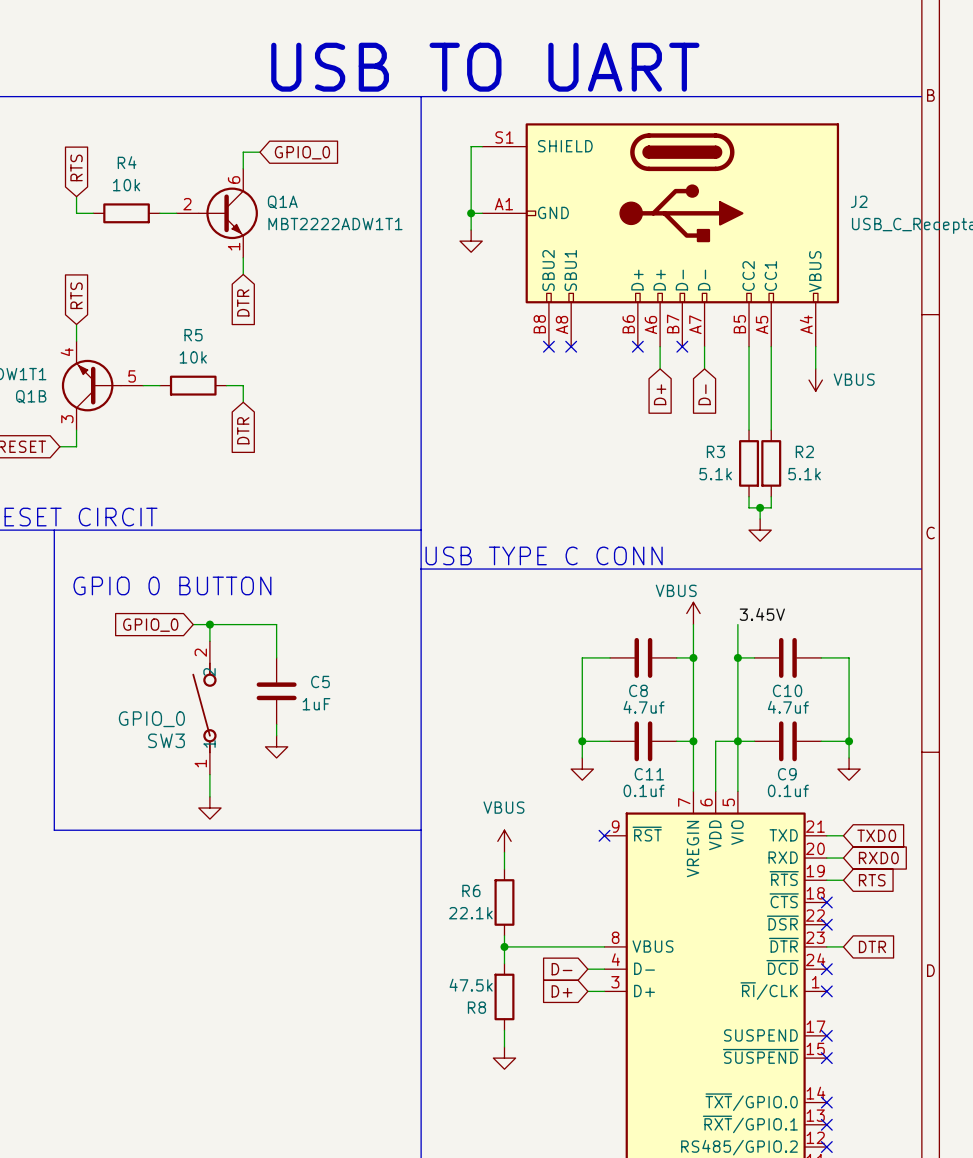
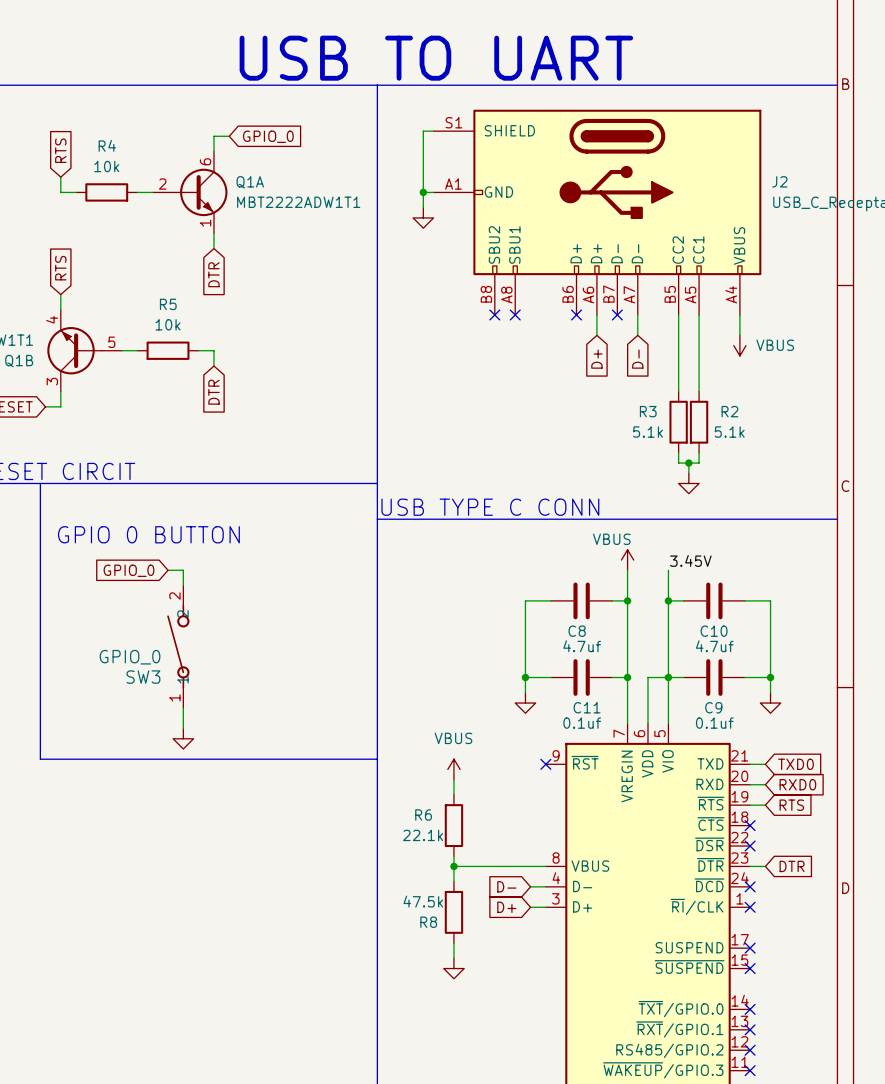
wire: (209, 624) (276, 624) (276, 657) -> none
junction: (209, 624) -> none
C5: 1uF (276, 691) -> none
wire: (276, 724) (276, 735) -> none
power symbol: (276, 746) -> none

